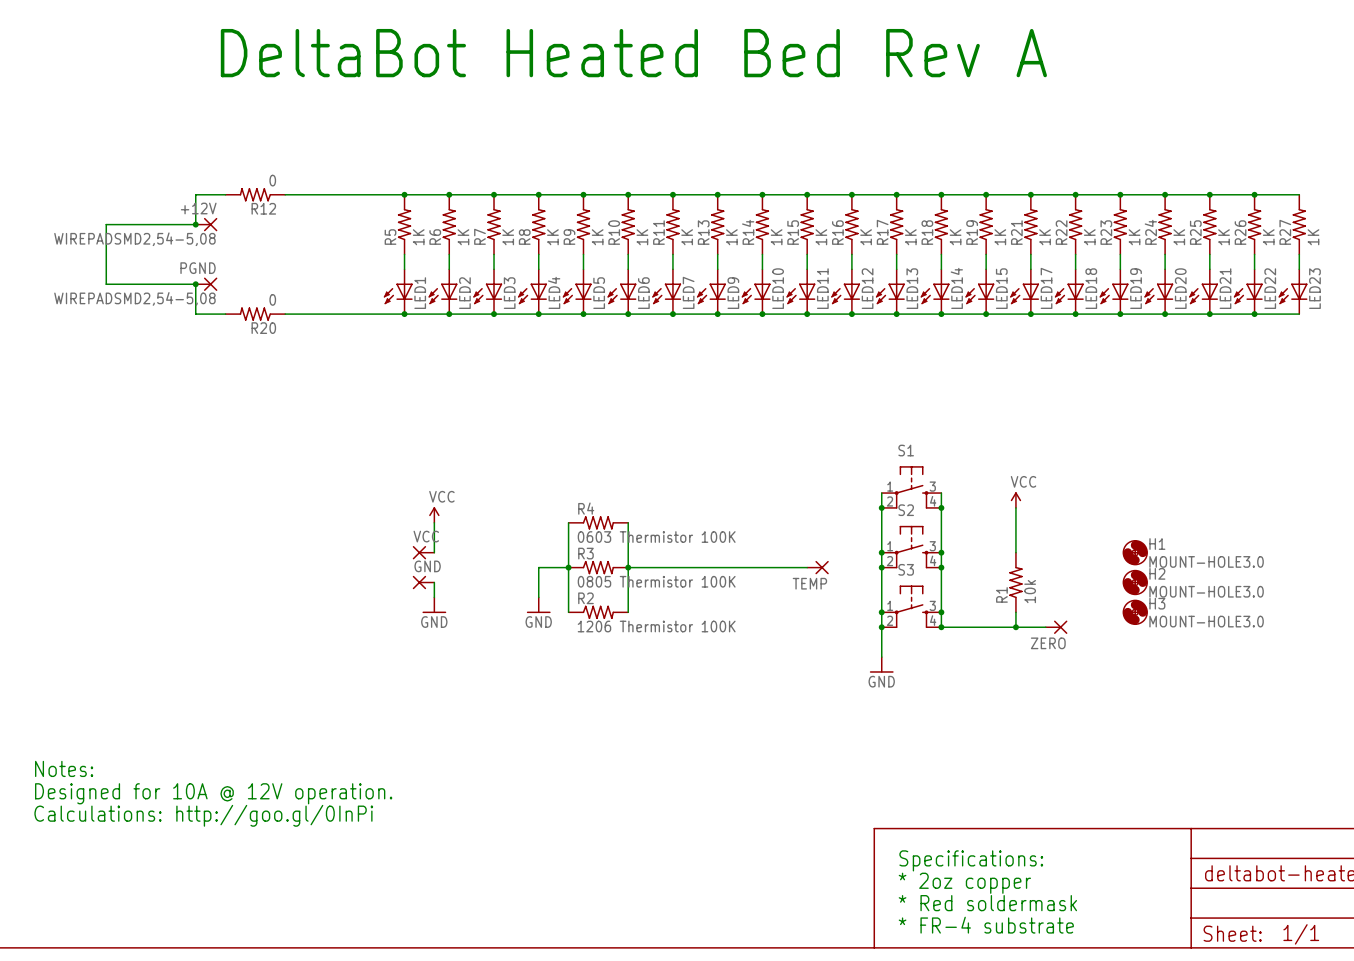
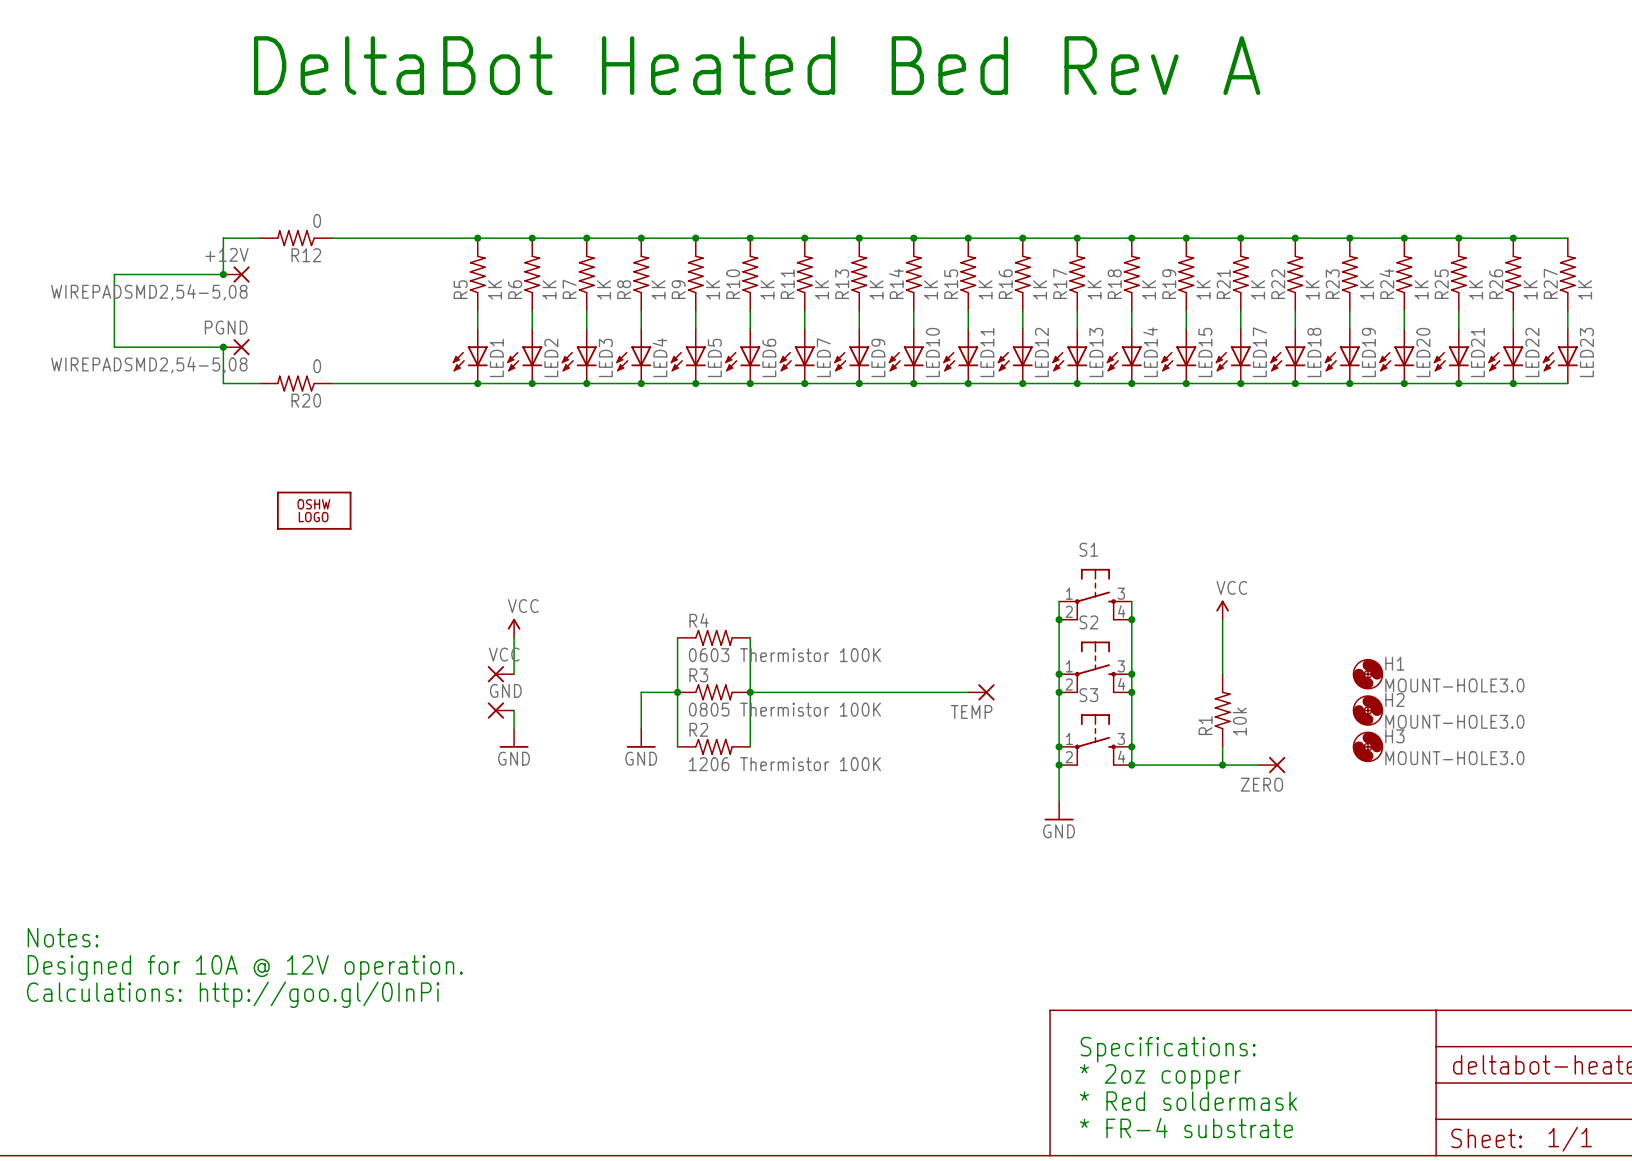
part: none -> (314, 510)

